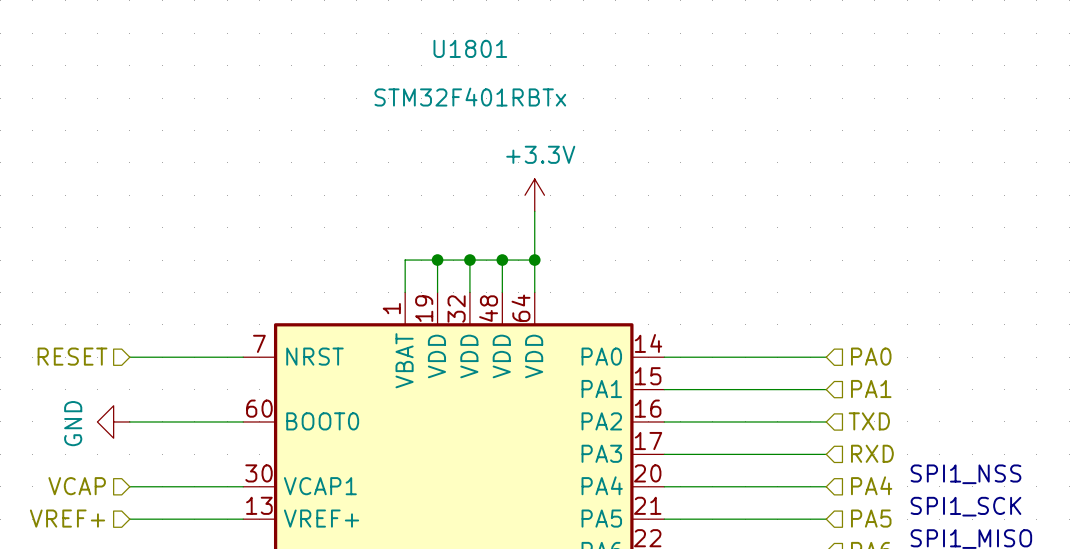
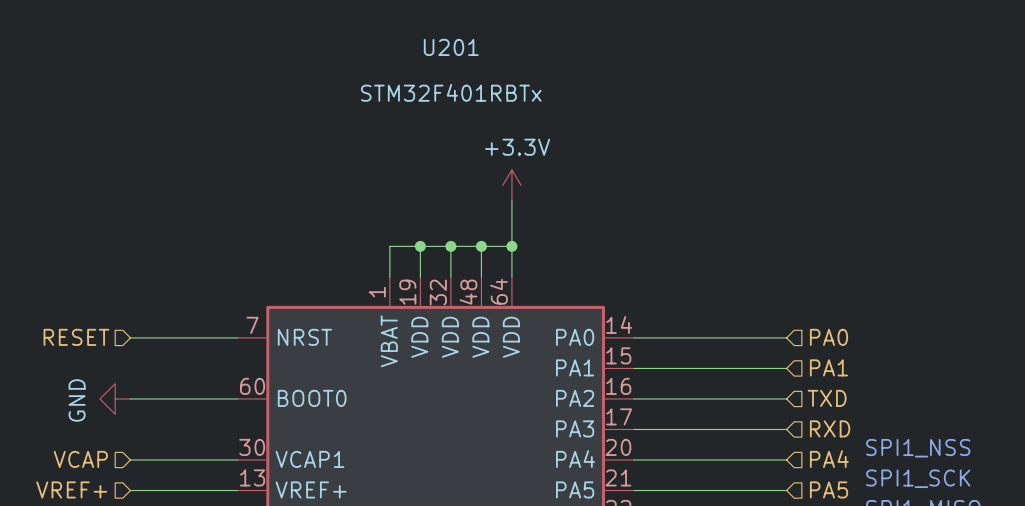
U1801 name: U1801 (470, 48) -> U201 (451, 47)

